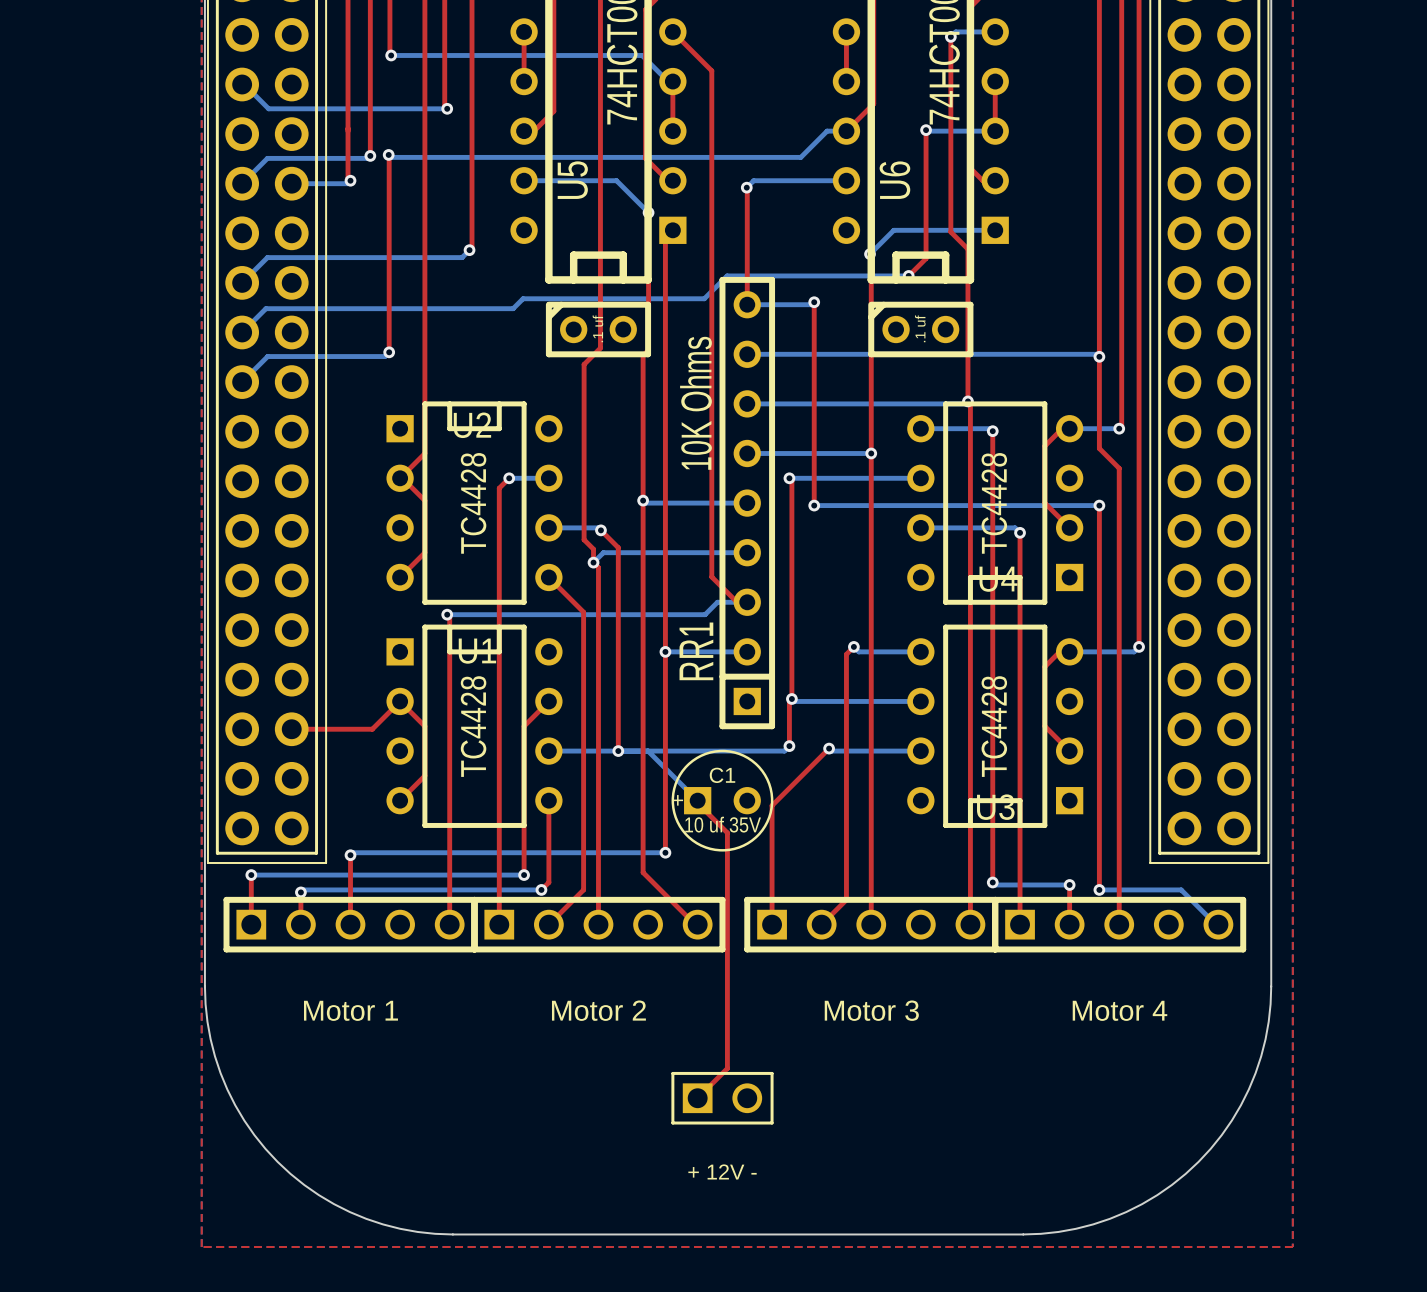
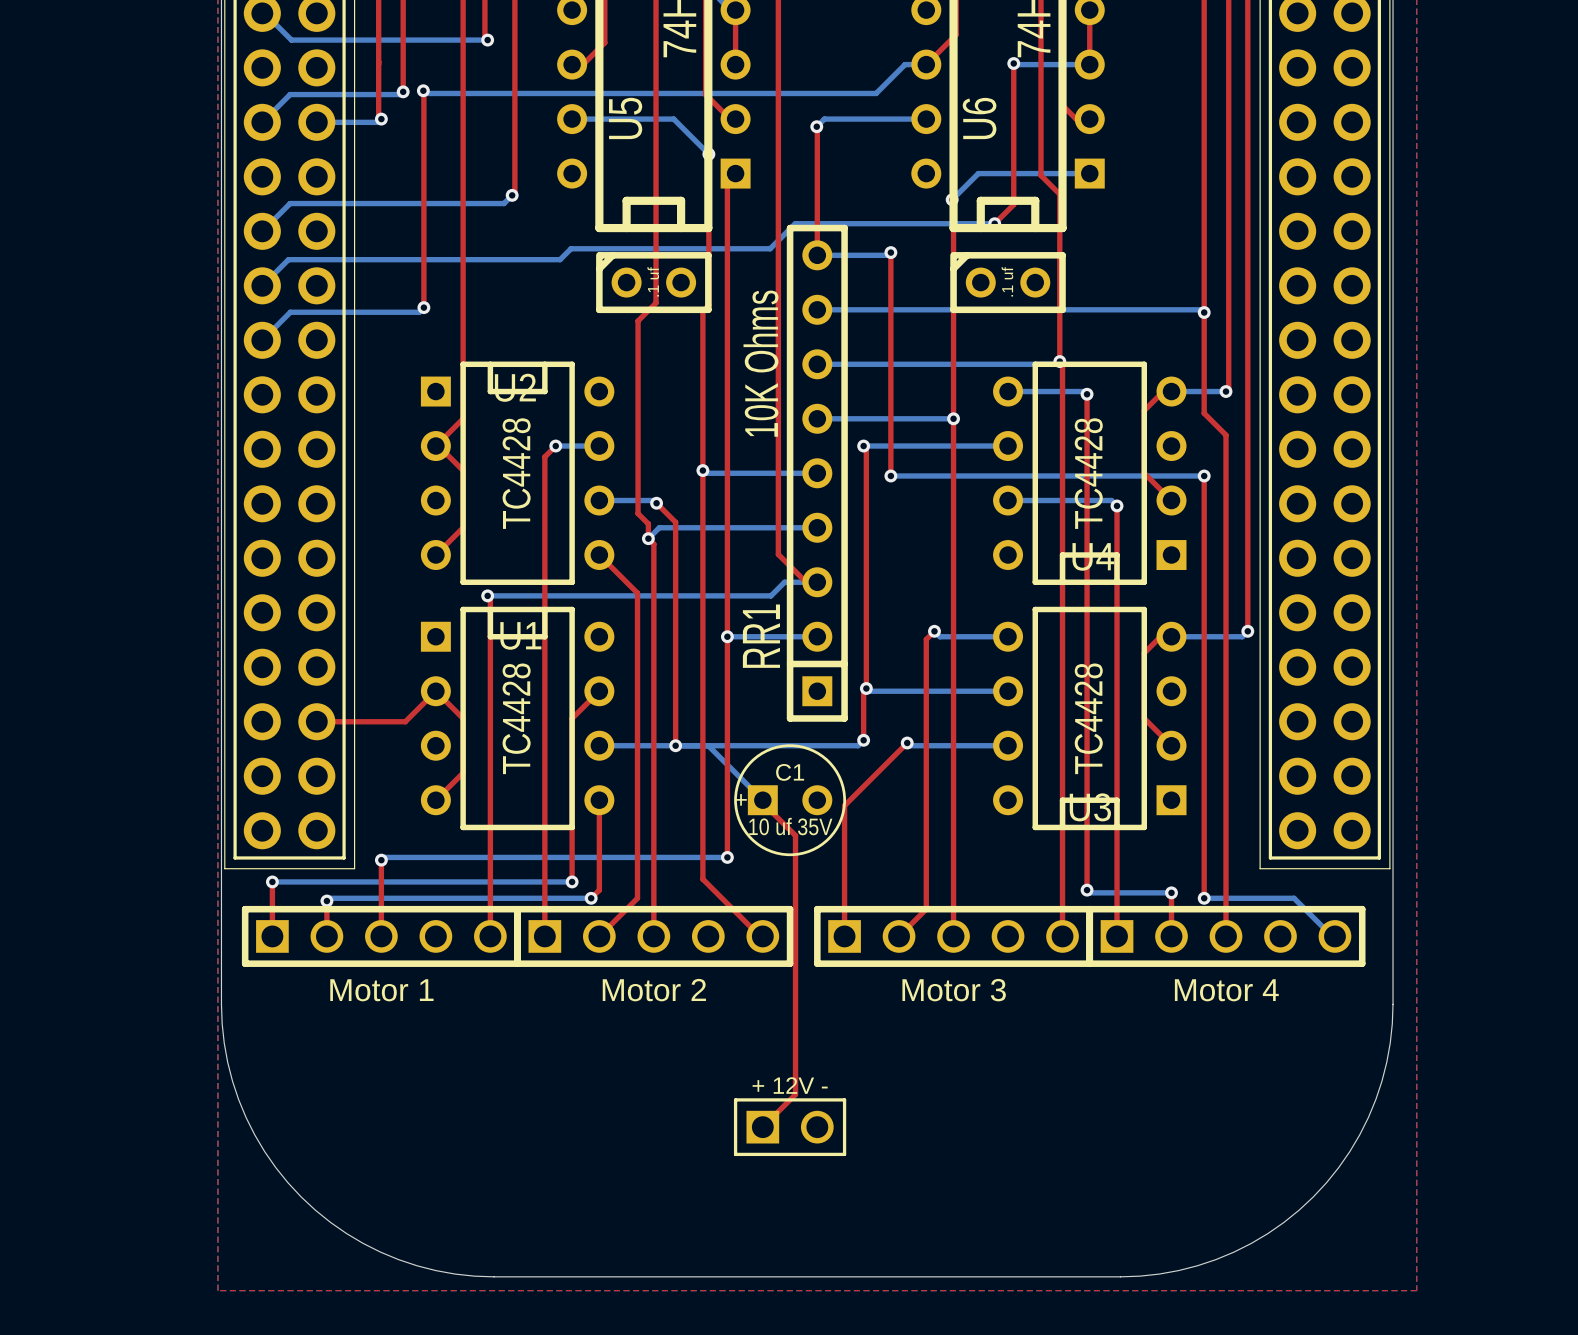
part value position: Motor 1 (350, 1010) -> Motor 1 (381, 990)
part value position: Motor 2 (598, 1010) -> Motor 2 (654, 990)
part value position: Motor 3 (871, 1010) -> Motor 3 (954, 990)
part value position: Motor 4 (1119, 1010) -> Motor 4 (1226, 990)
part value position: + 12V - (722, 1171) -> + 12V - (790, 1085)

